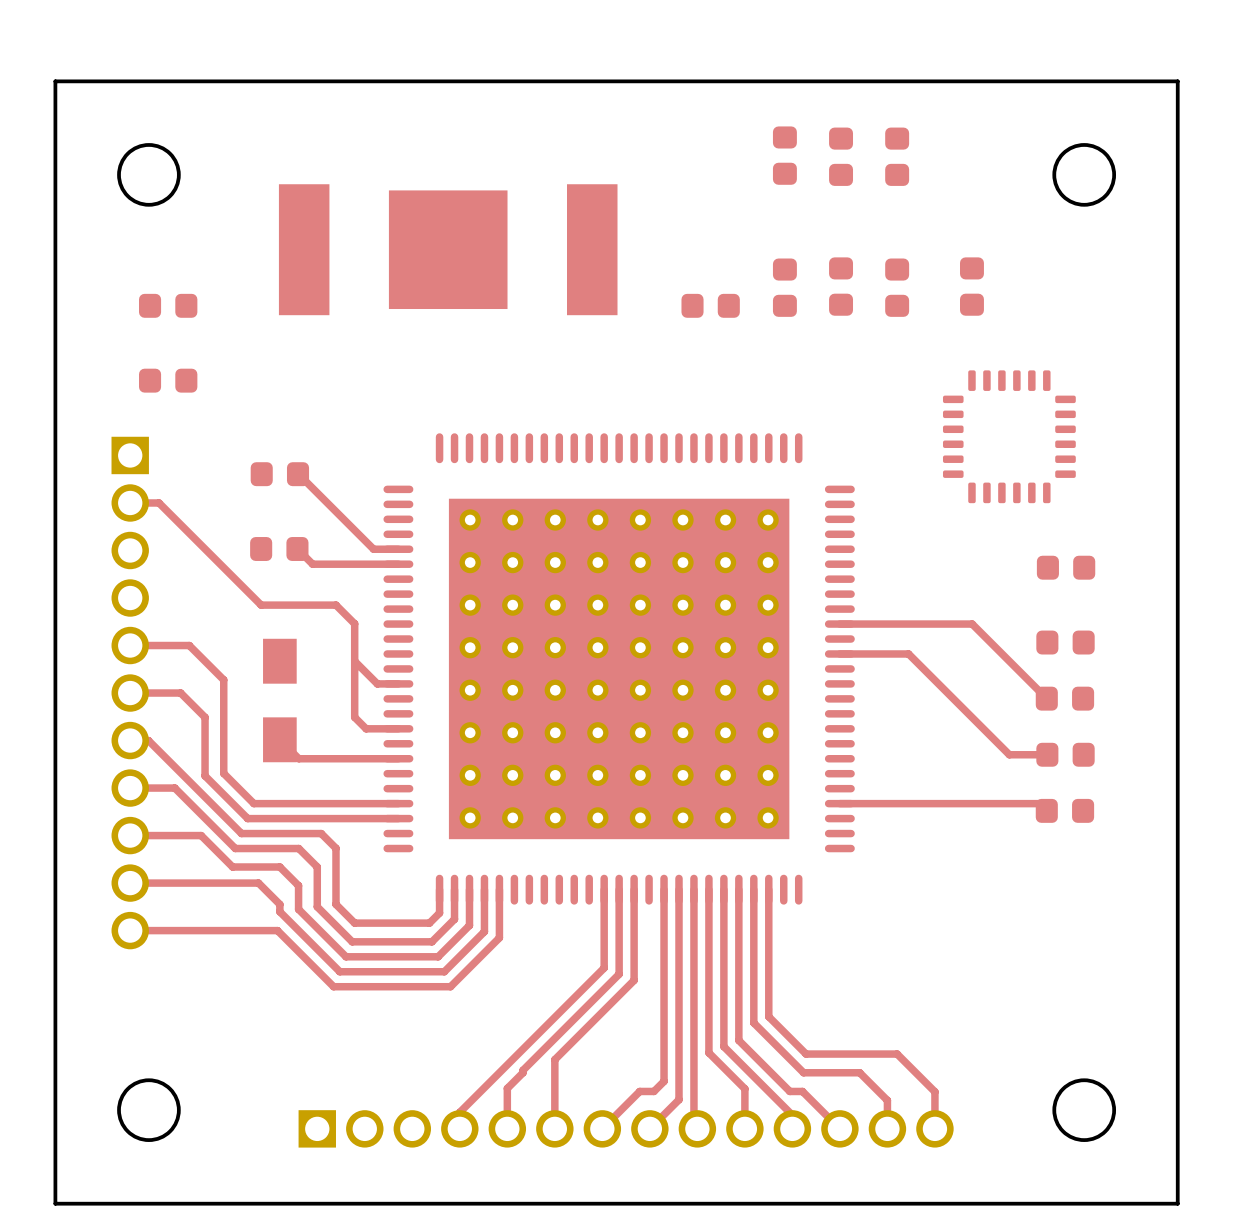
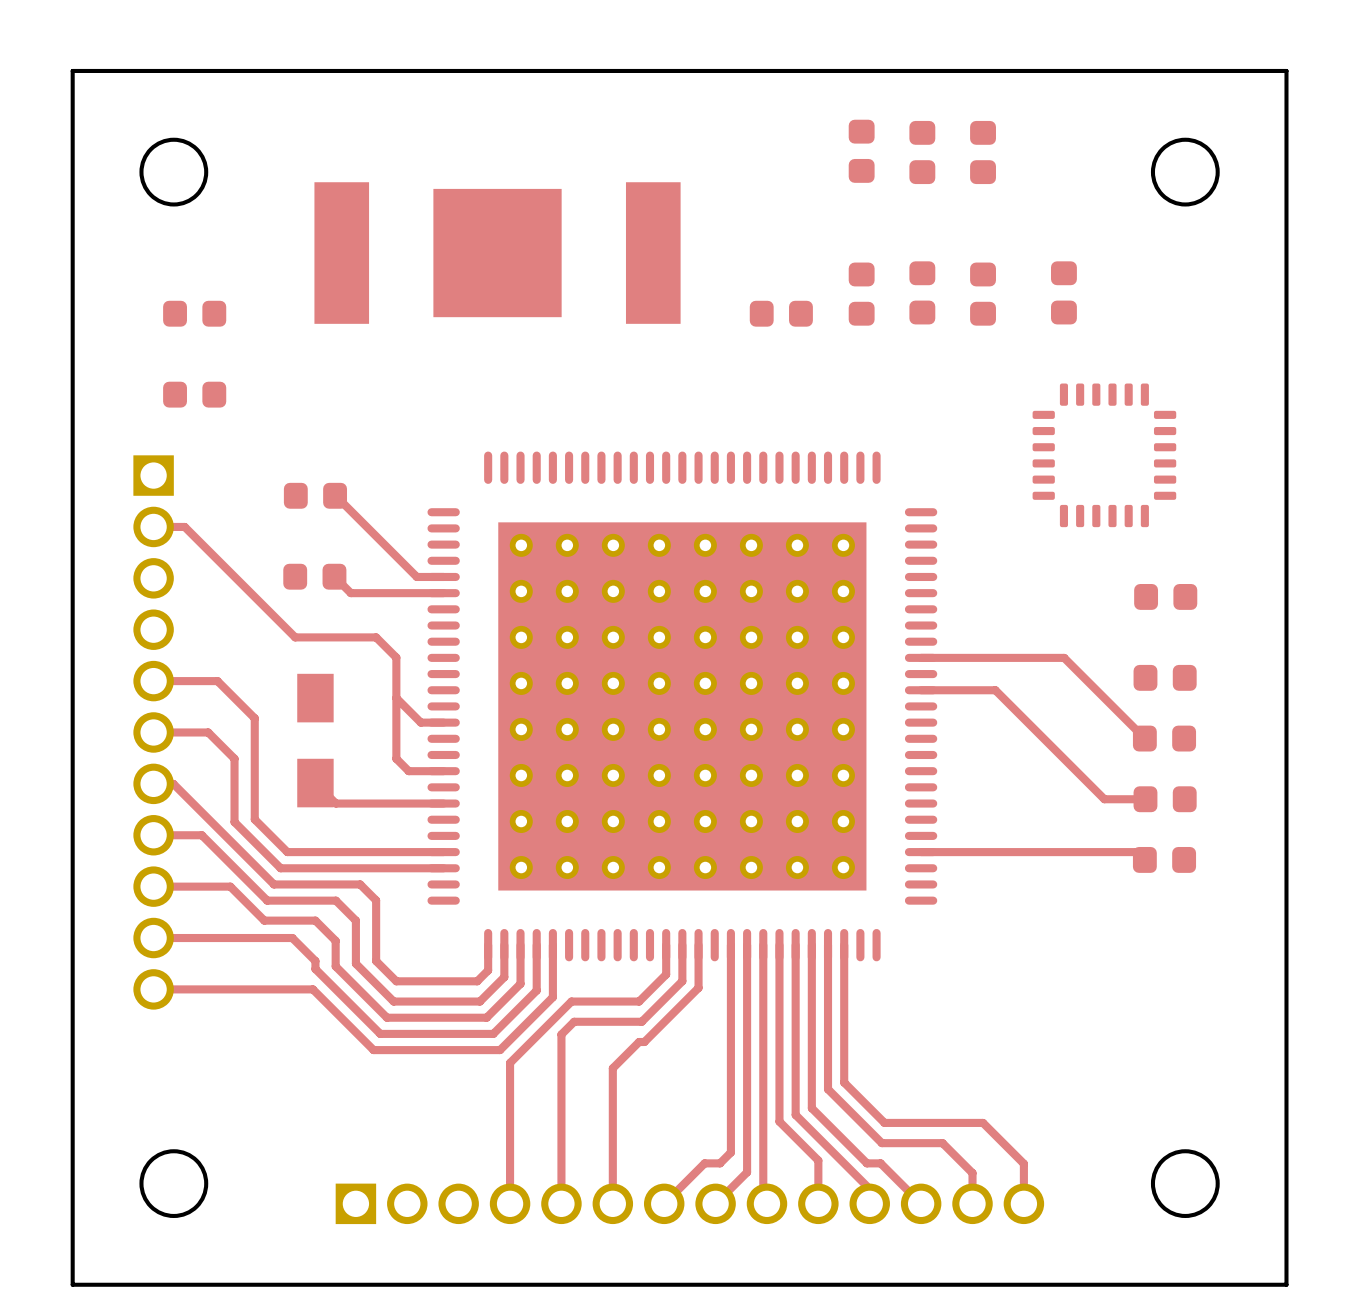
top track: (604, 916) (604, 968) (459, 1112) -> (666, 974) (639, 1001) (571, 1001) (510, 1062) (510, 1185)
top track: (619, 923) (619, 974) (507, 1088) -> (682, 981) (641, 1021) (574, 1021) (561, 1034) (561, 1160)
top track: (634, 929) (634, 980) (554, 1059) -> (698, 987) (644, 1042) (639, 1042) (612, 1068) (612, 1128)

